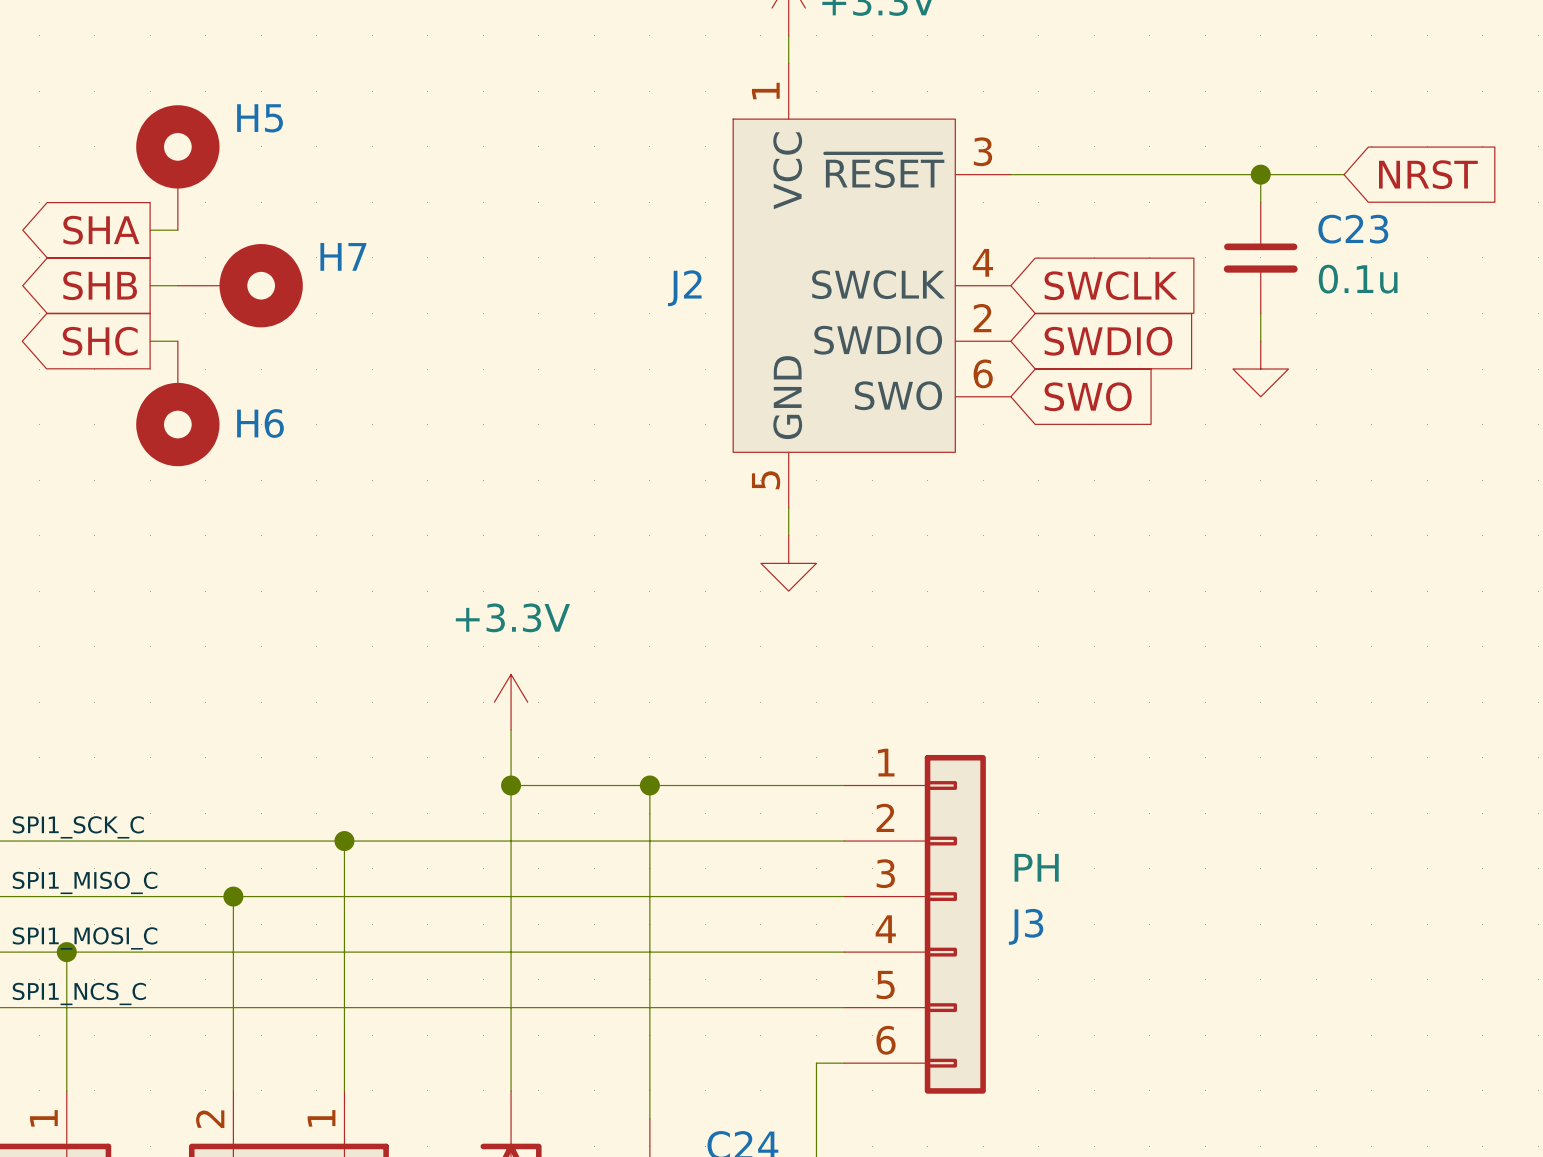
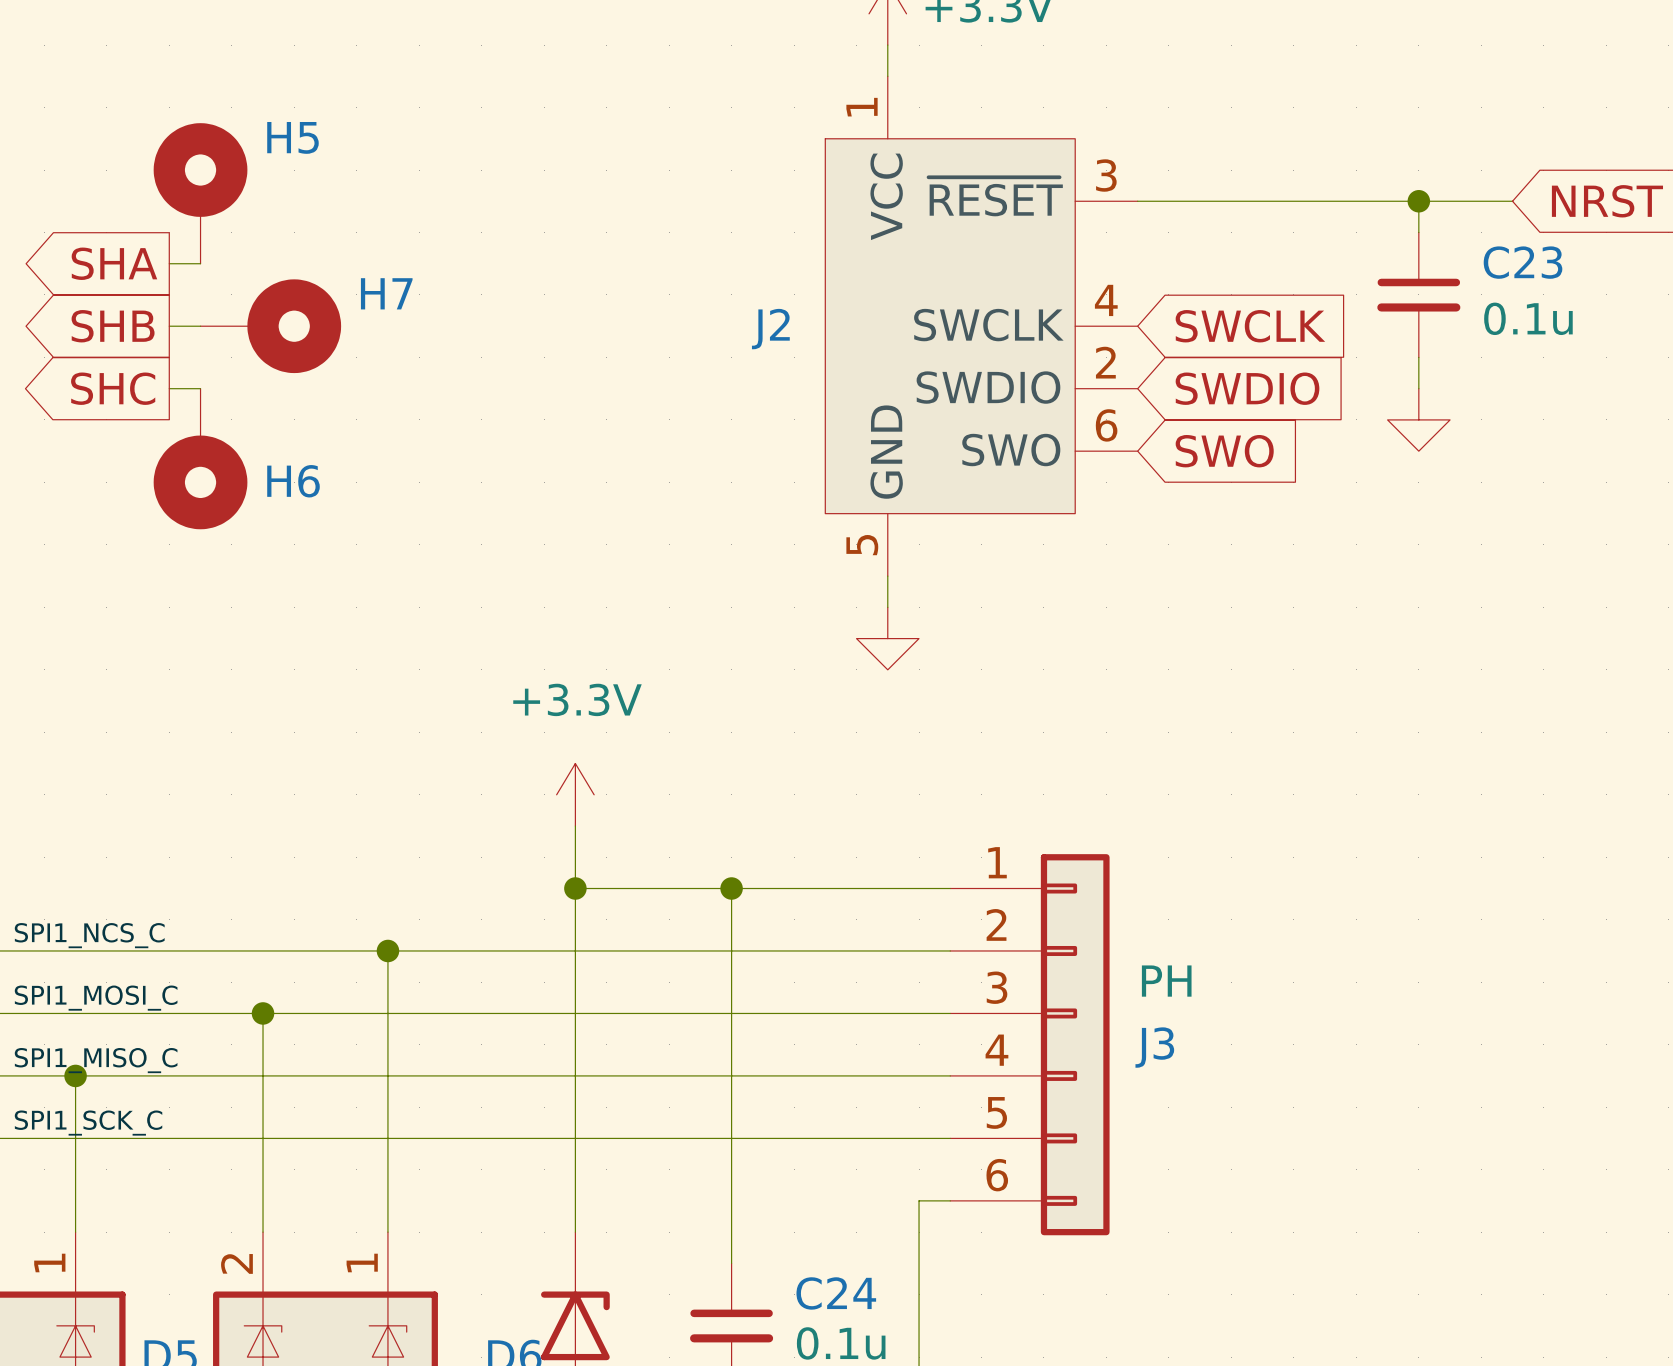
label: SPI1_SCK_C (78, 827) -> SPI1_NCS_C (89, 935)
label: SPI1_MISO_C (85, 882) -> SPI1_MOSI_C (96, 998)
label: SPI1_MOSI_C (85, 938) -> SPI1_MISO_C (96, 1060)
label: SPI1_NCS_C (79, 993) -> SPI1_SCK_C (88, 1123)

